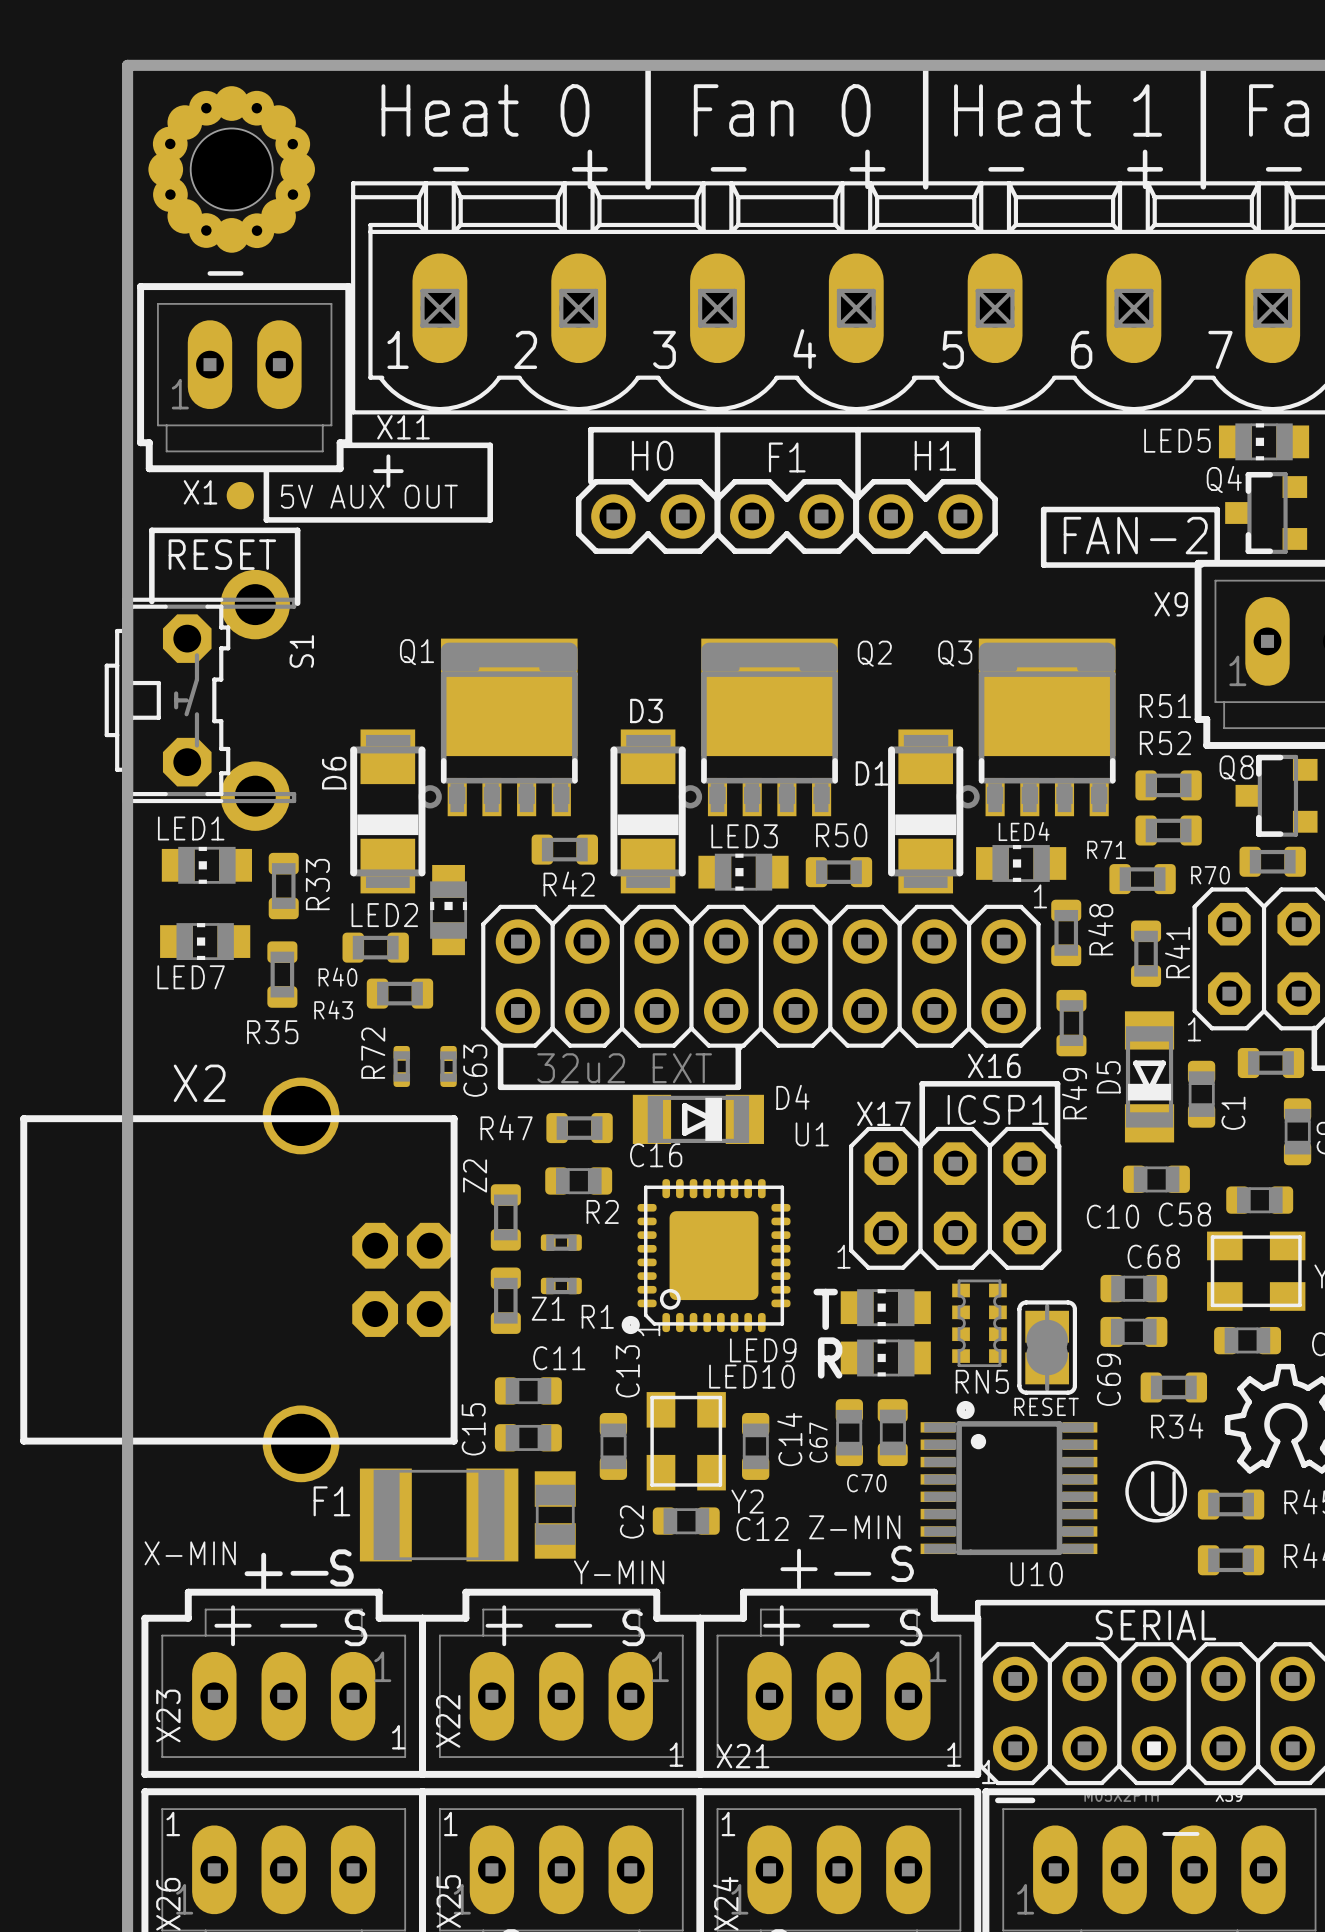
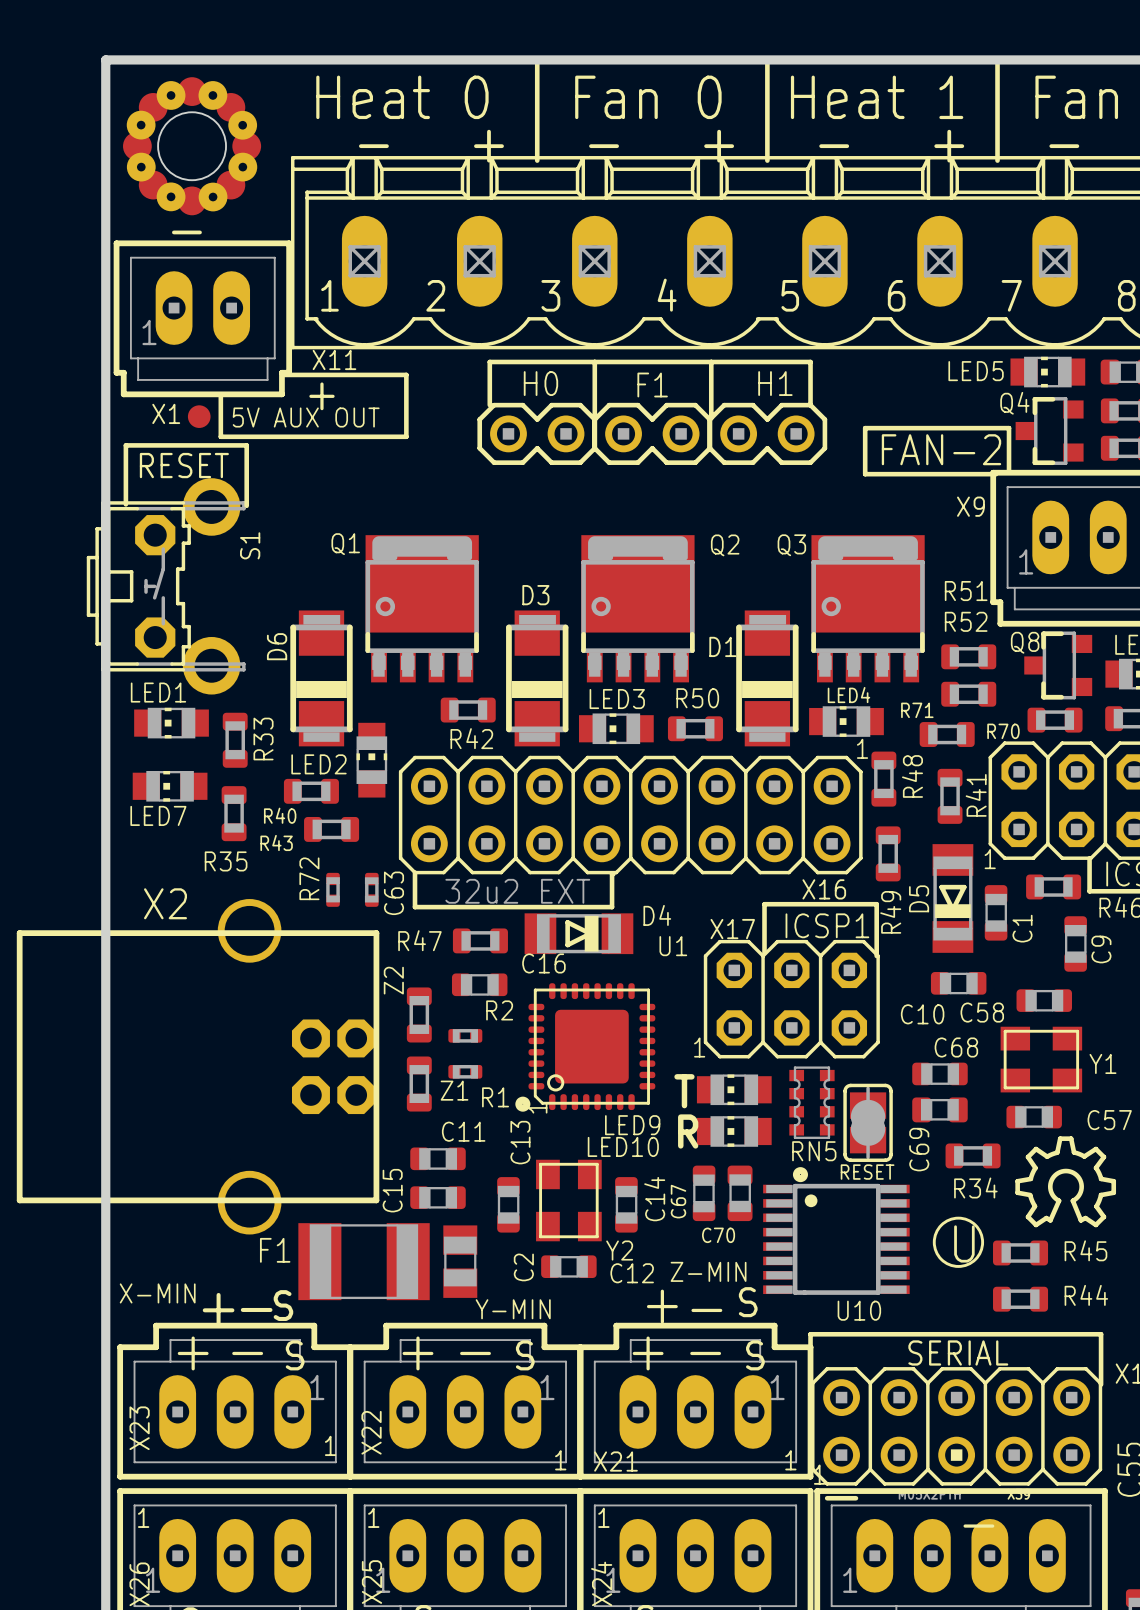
Q1 footprint: [418, 638, 578, 817] -> [365, 535, 479, 683]
Q2 footprint: [678, 638, 838, 817] -> [581, 535, 695, 683]
Q3 footprint: [956, 638, 1116, 817] -> [811, 535, 925, 683]

